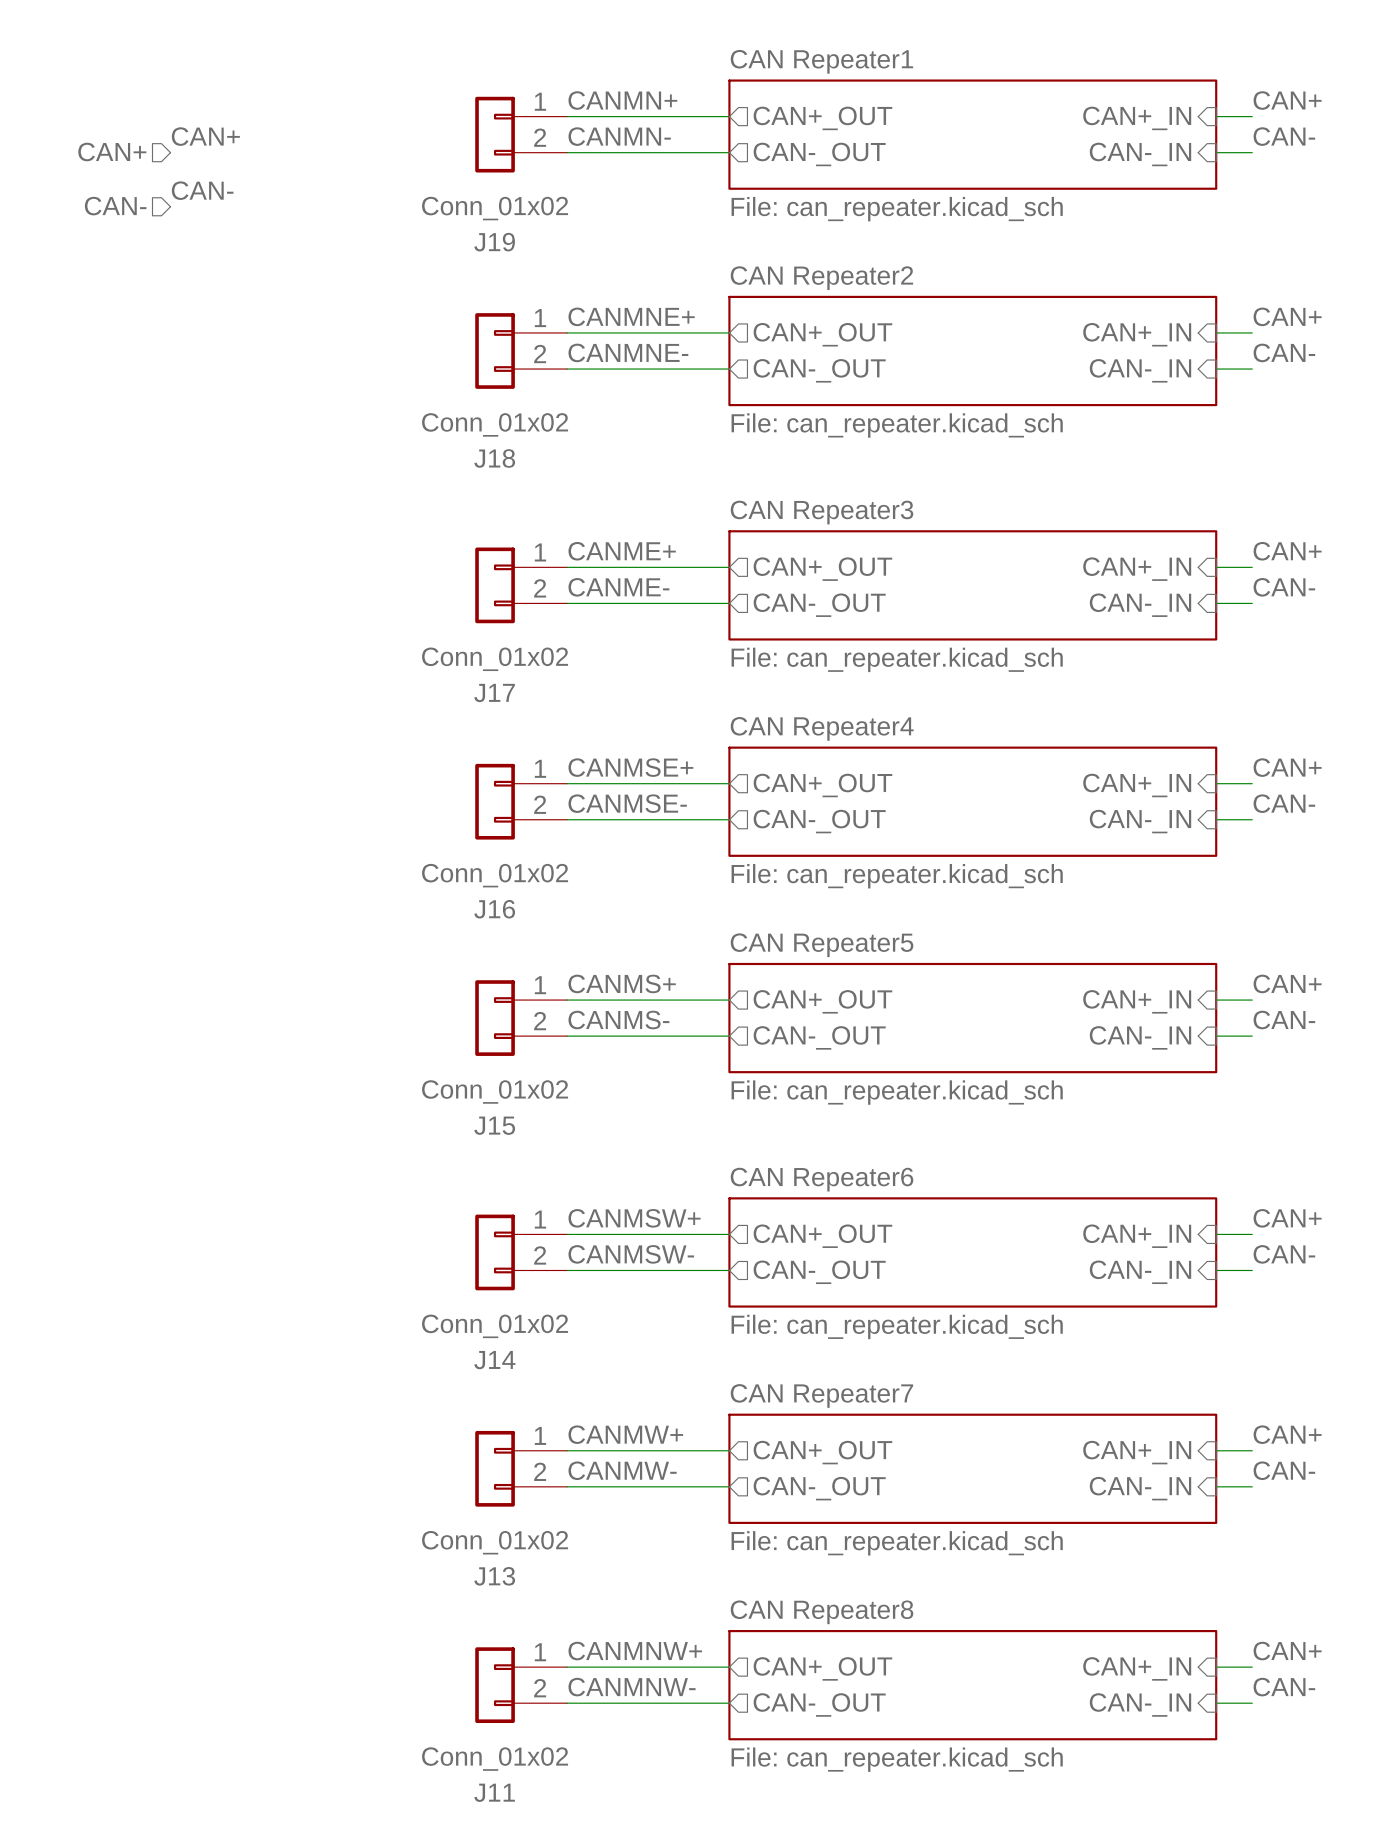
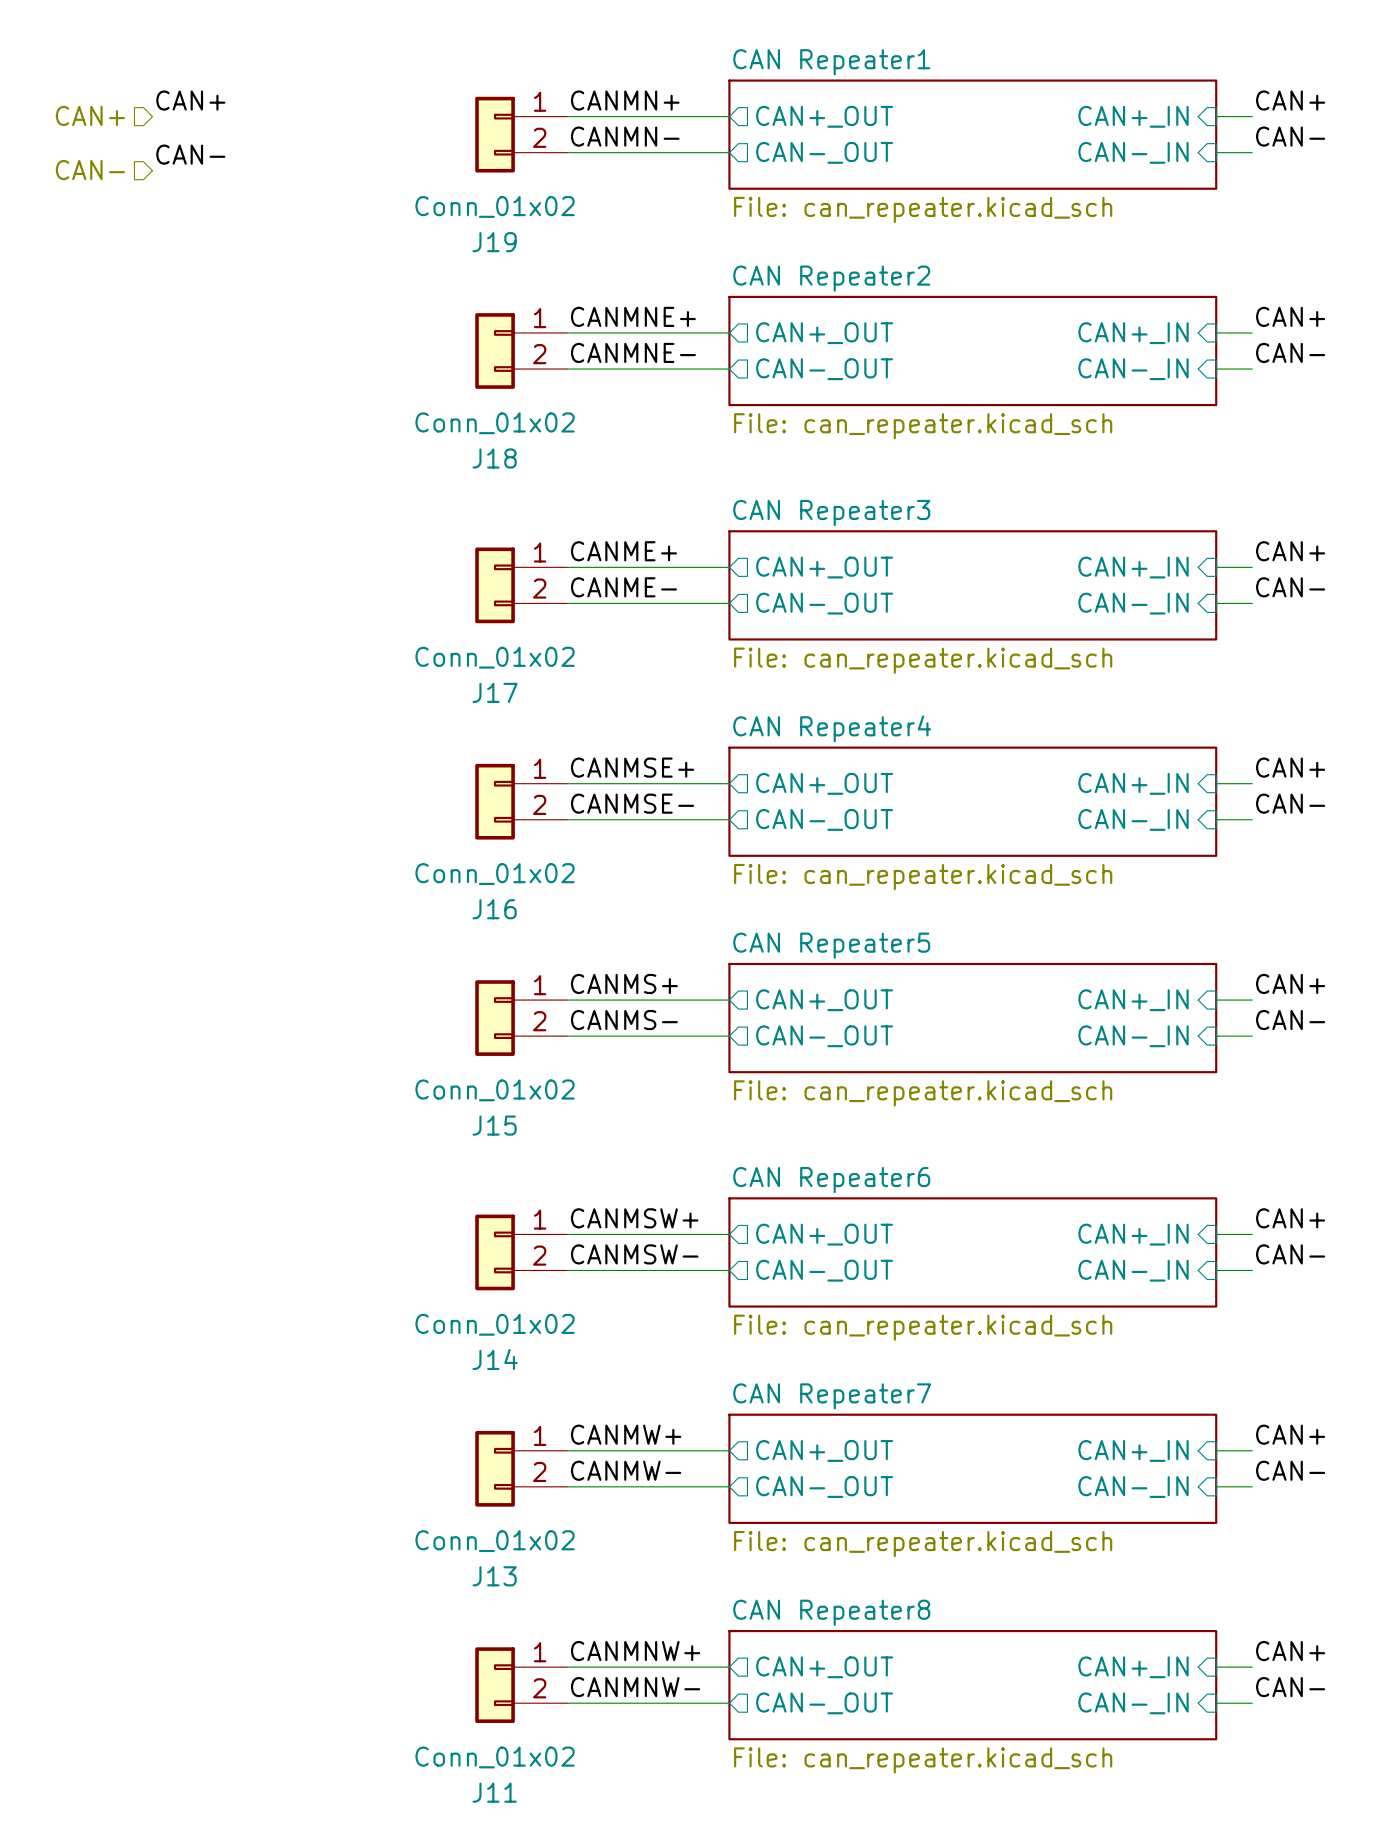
label position: CAN+ (205, 136) -> CAN+ (190, 100)
hierarchical label position: CAN+ (112, 151) -> CAN+ (90, 115)
label position: CAN- (202, 190) -> CAN- (190, 154)
hierarchical label position: CAN- (115, 206) -> CAN- (90, 170)

